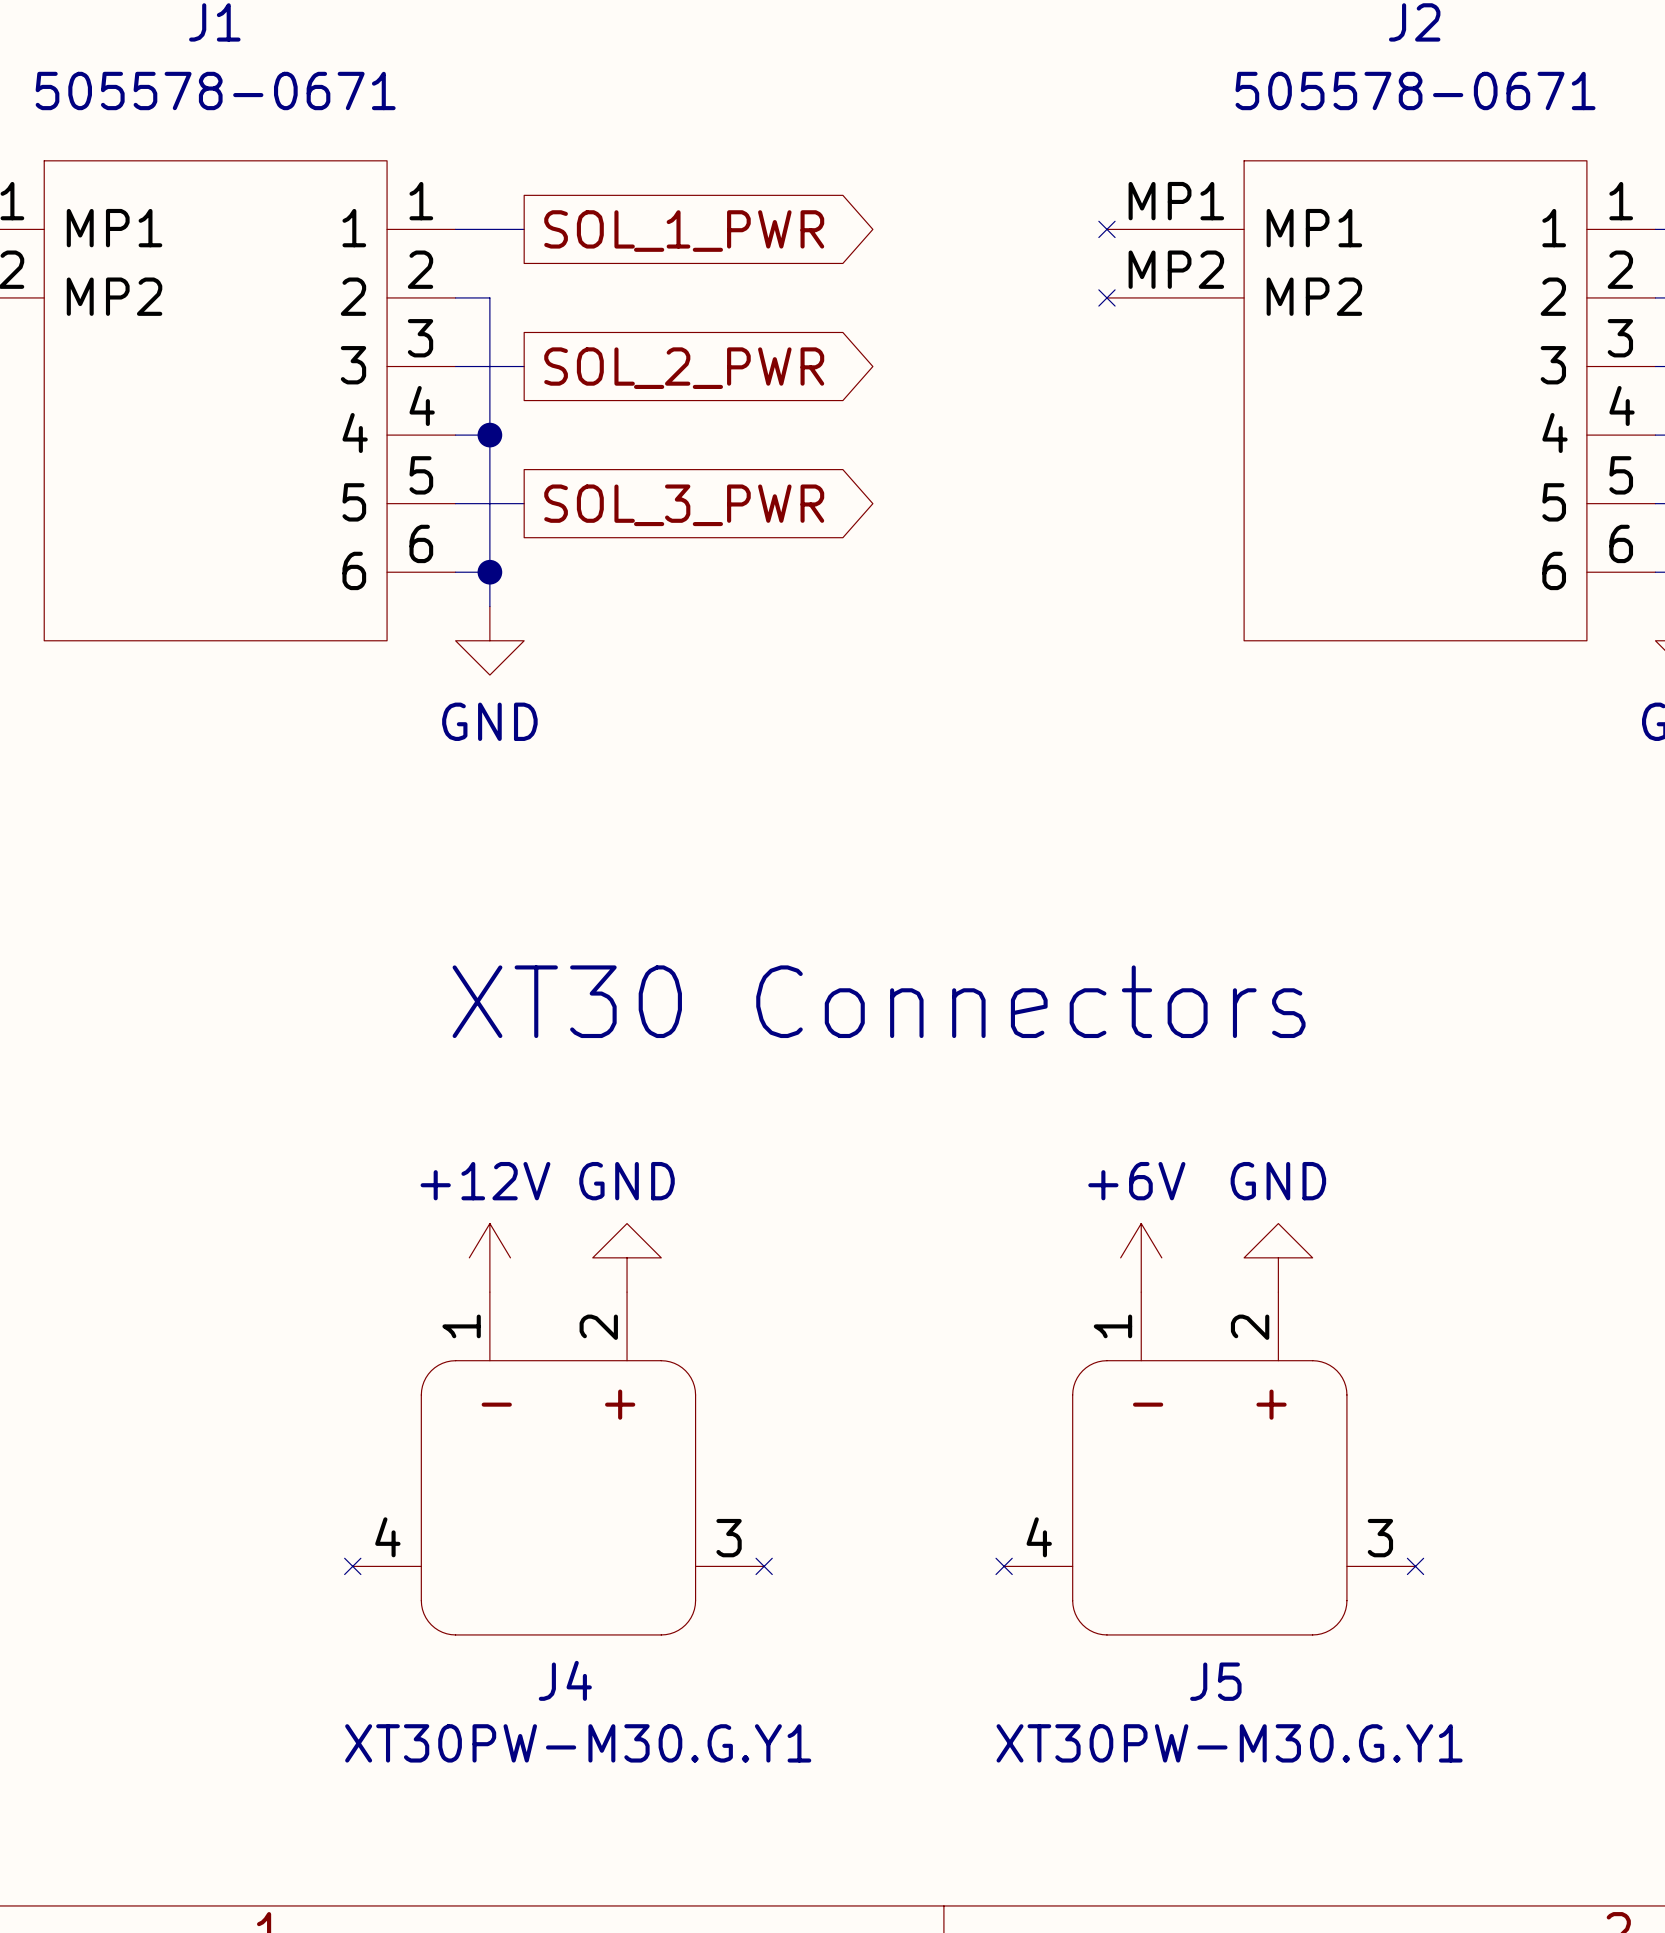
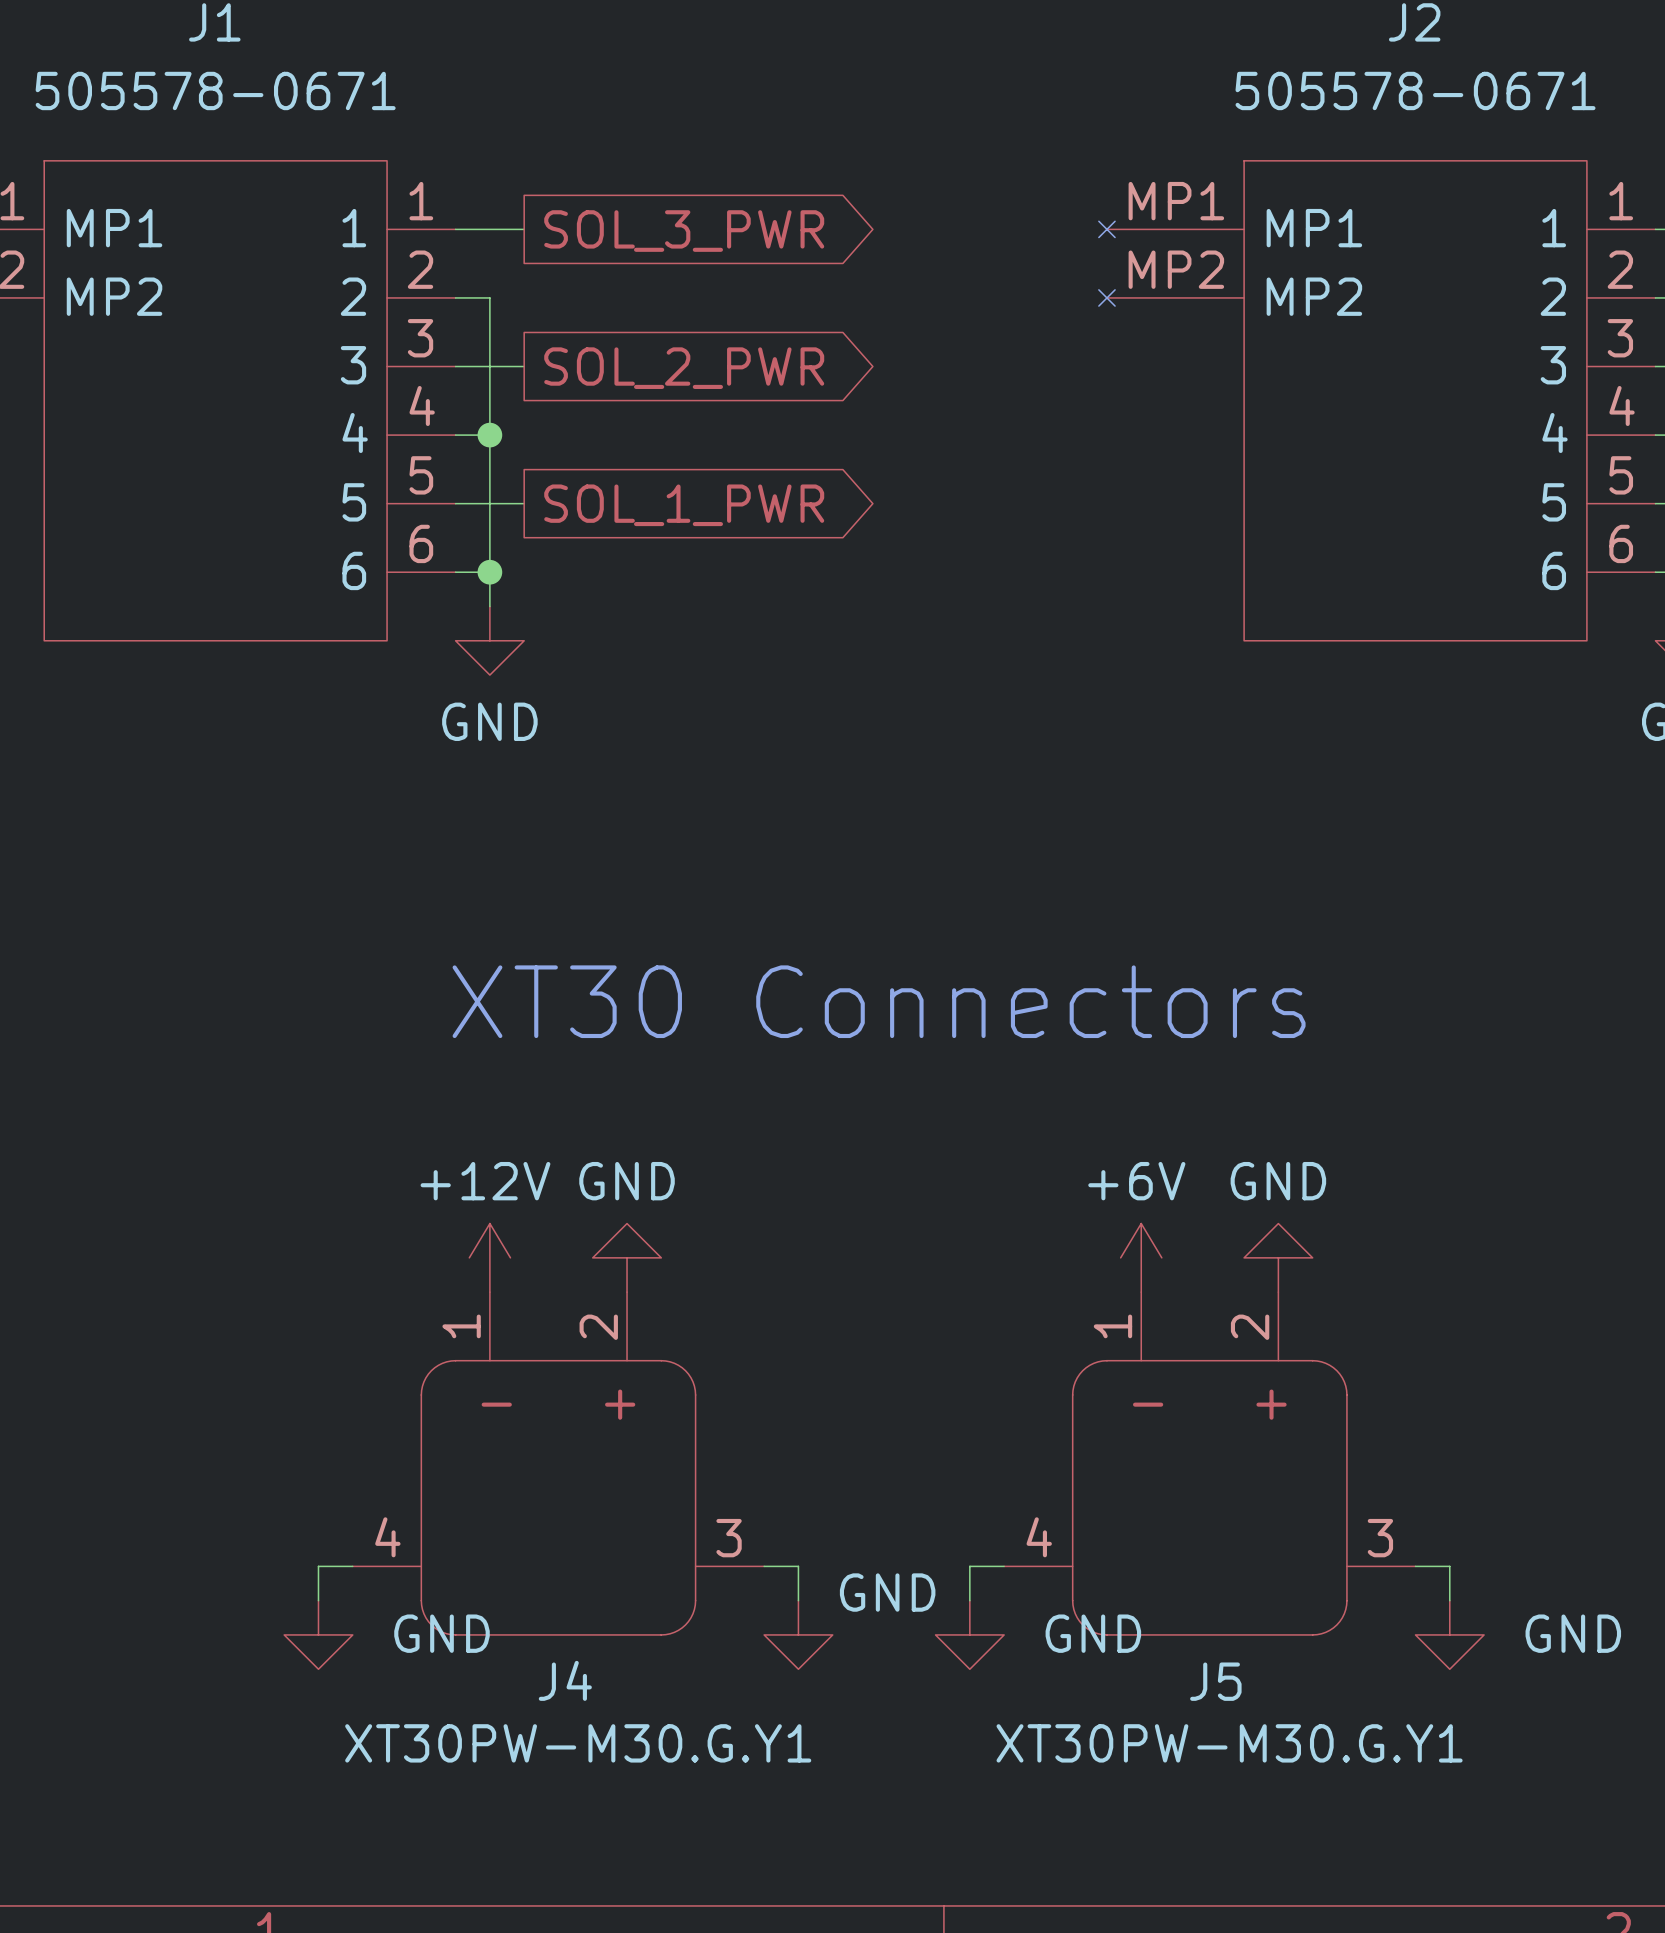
global label: SOL_1_PWR (684, 231) -> SOL_3_PWR (684, 231)
global label: SOL_3_PWR (684, 505) -> SOL_1_PWR (684, 505)
J4 symbol: [344, 1292, 773, 1635] -> [352, 1292, 765, 1635]
J5 symbol: [996, 1292, 1424, 1635] -> [1004, 1292, 1416, 1635]
wire: none -> (352, 1566) (318, 1566) (318, 1600)
wire: none -> (764, 1566) (798, 1566) (798, 1600)
wire: none -> (1004, 1566) (969, 1566) (969, 1600)
wire: none -> (1415, 1566) (1449, 1566) (1449, 1600)
power symbol: none -> GND (318, 1634)
power symbol: none -> GND (798, 1634)
power symbol: none -> GND (969, 1634)
power symbol: none -> GND (1449, 1634)

